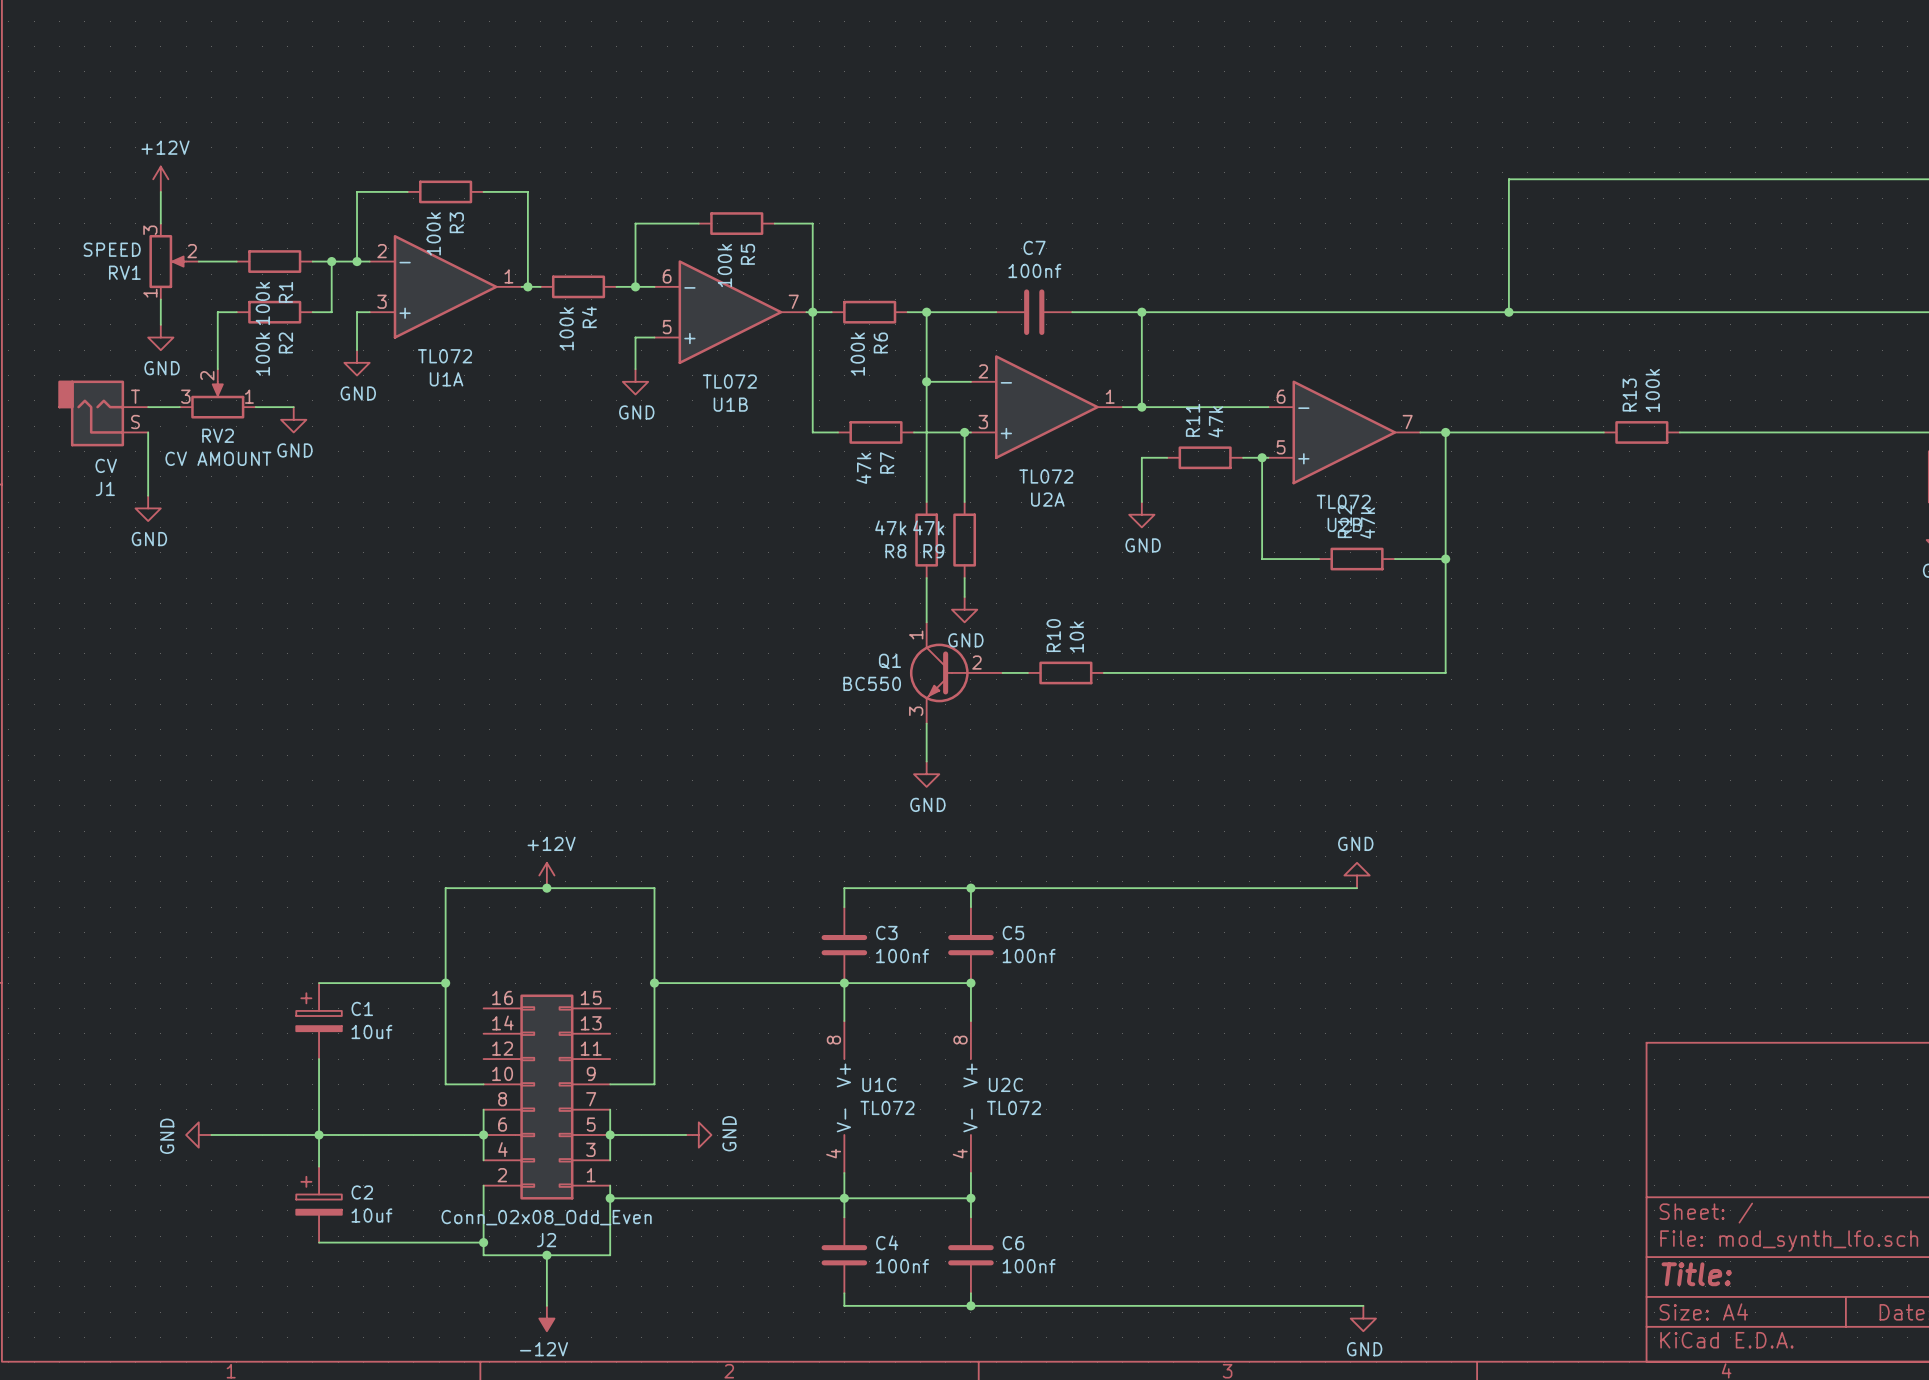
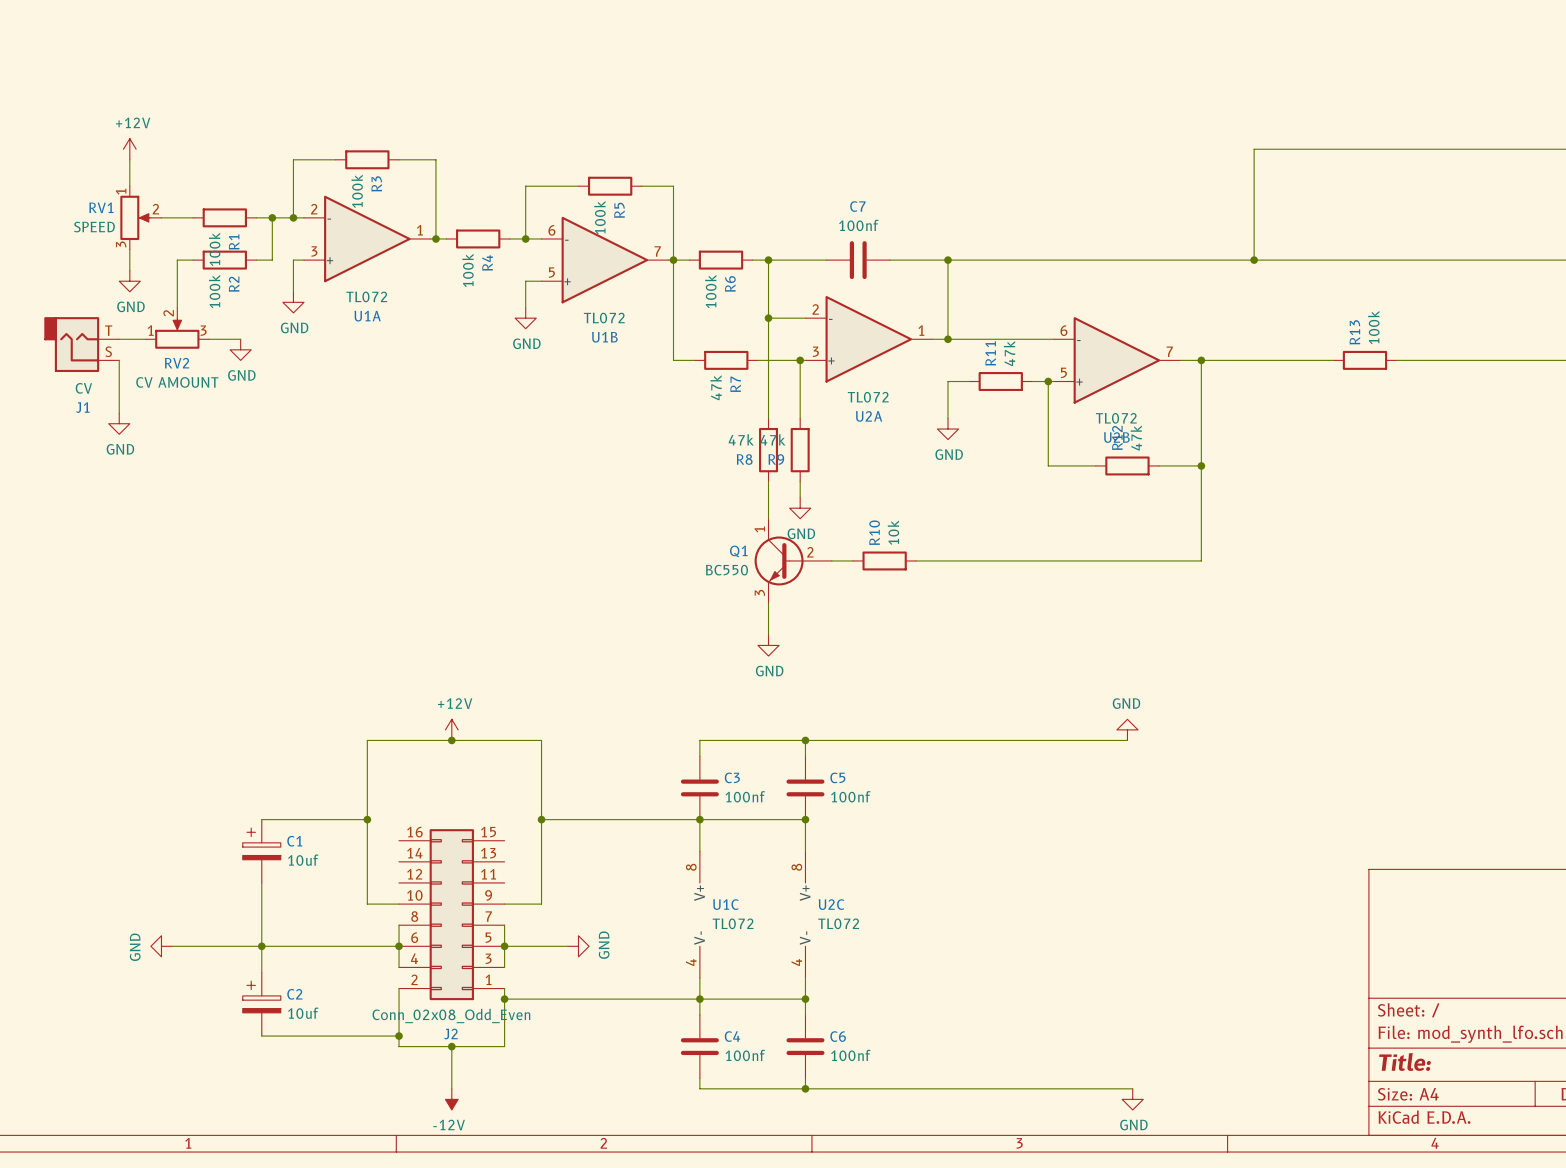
RV1 flip: as is (167, 261) -> up-down (135, 217)
RV2 flip: as is (217, 400) -> left-right (177, 333)

